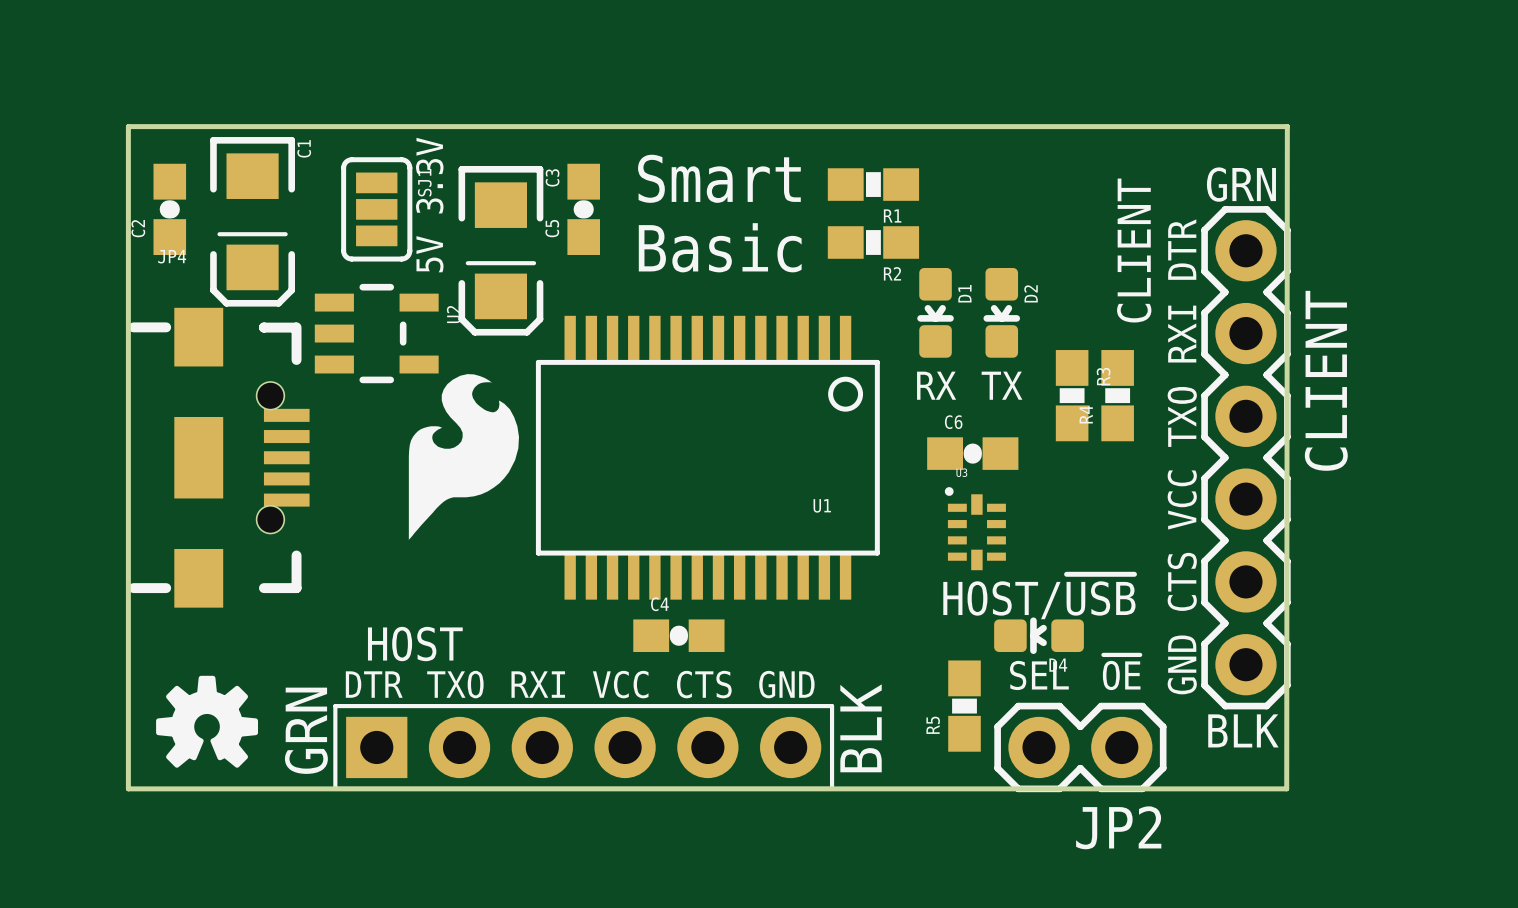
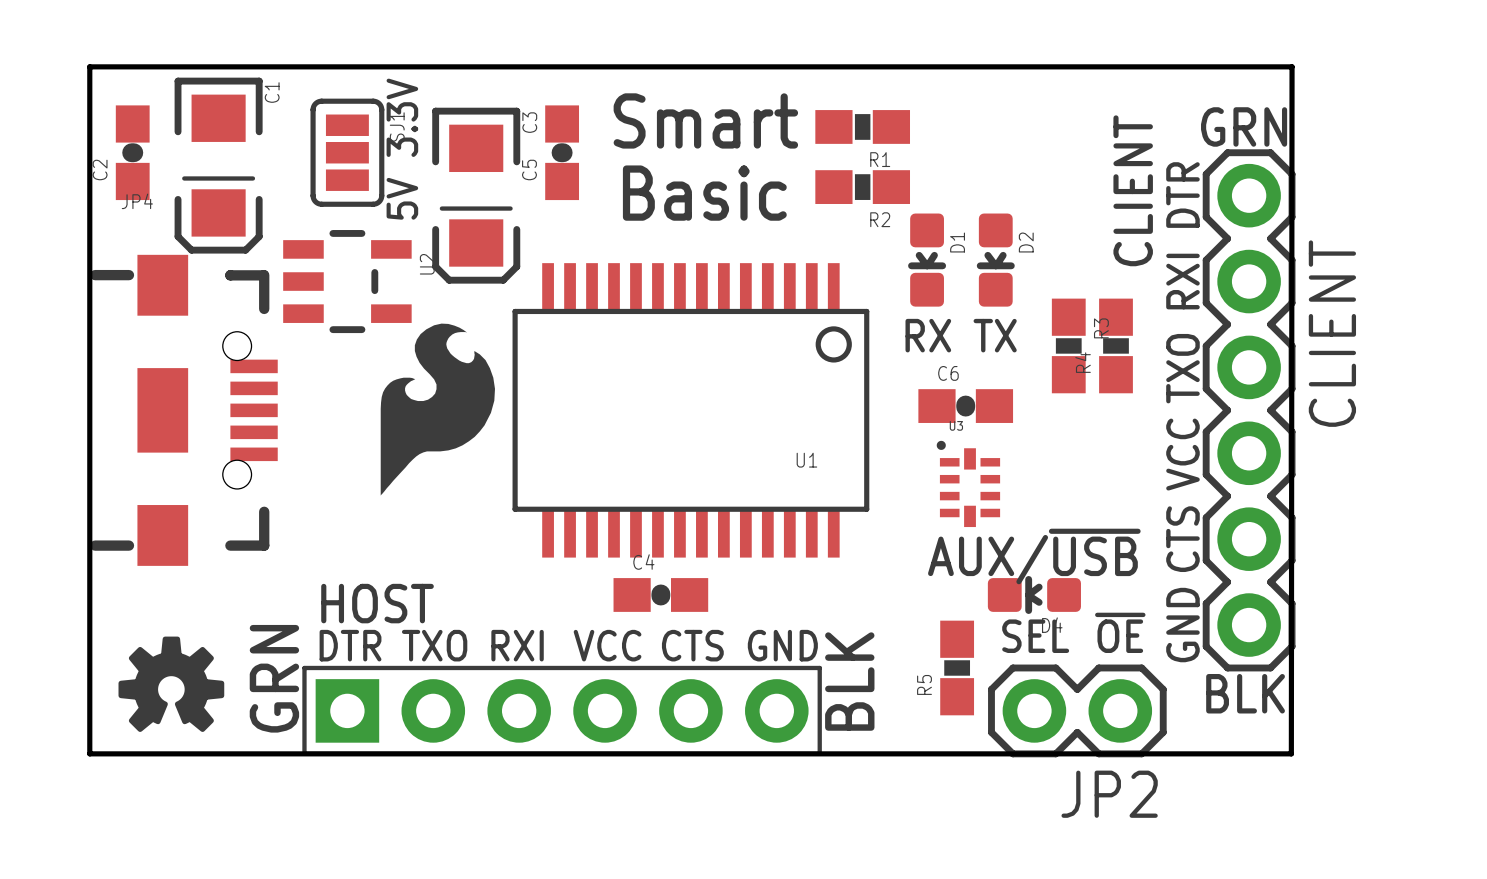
text: HOST/~{USB} (1039, 596) -> AUX/~{USB} (1034, 556)

